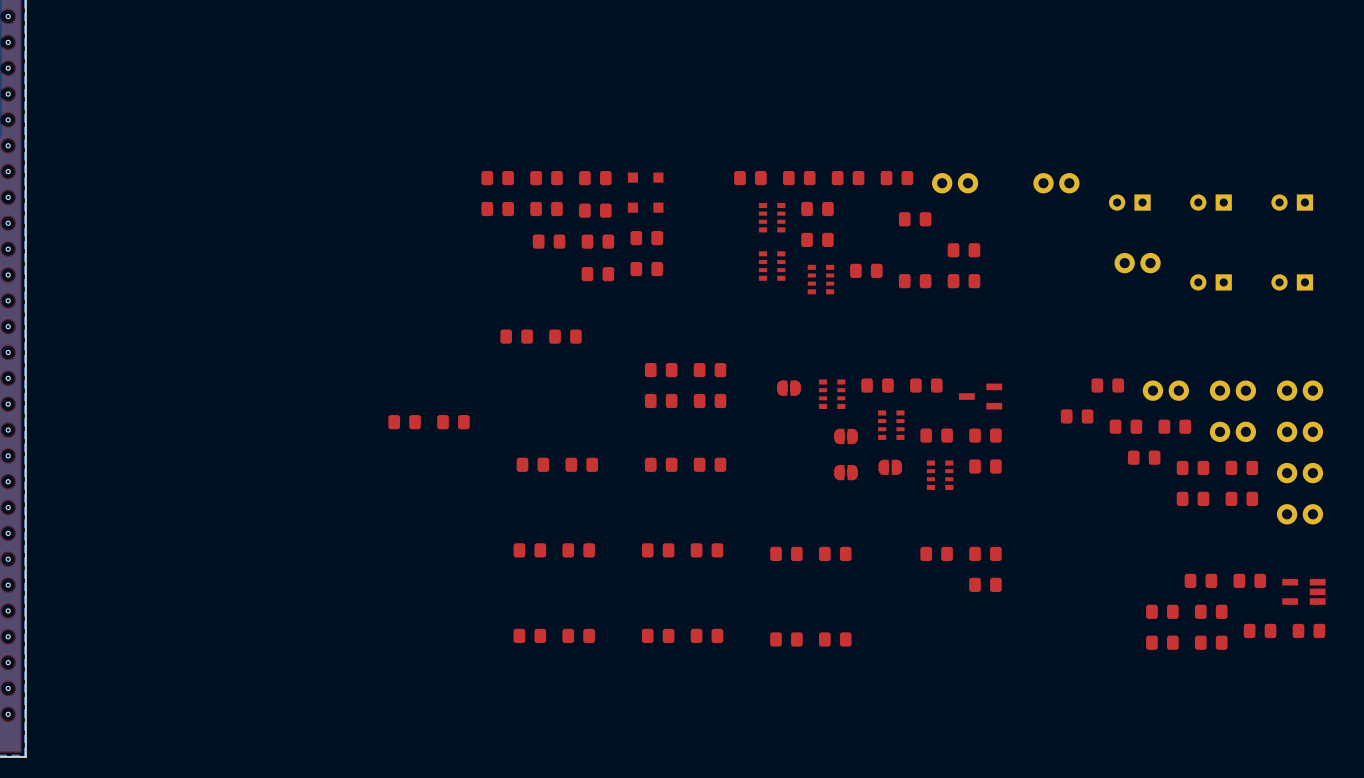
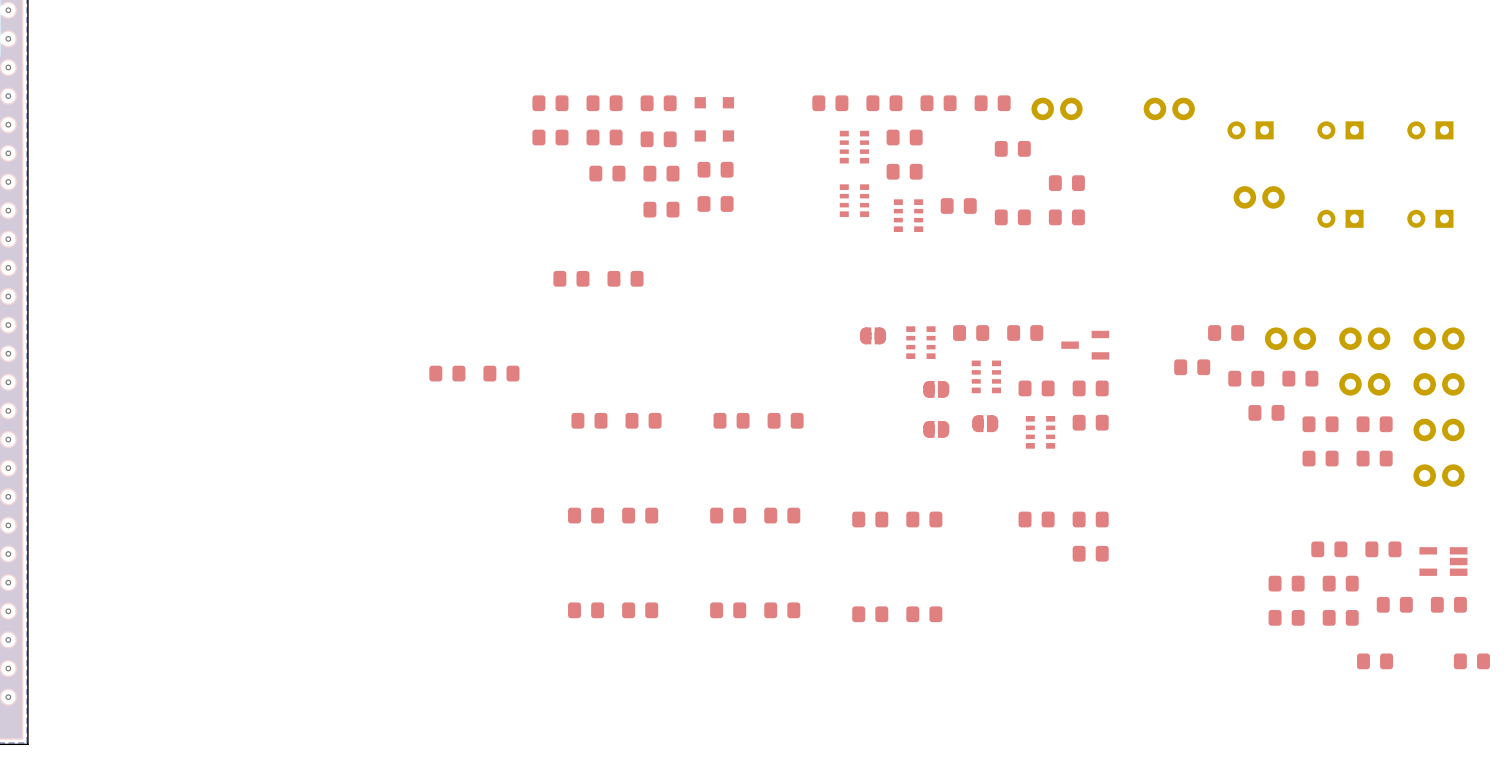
part: (661, 370) -> none
part: (710, 370) -> none
part: (661, 401) -> none
part: (710, 401) -> none
part: none -> (1375, 661)
part: none -> (1471, 661)

